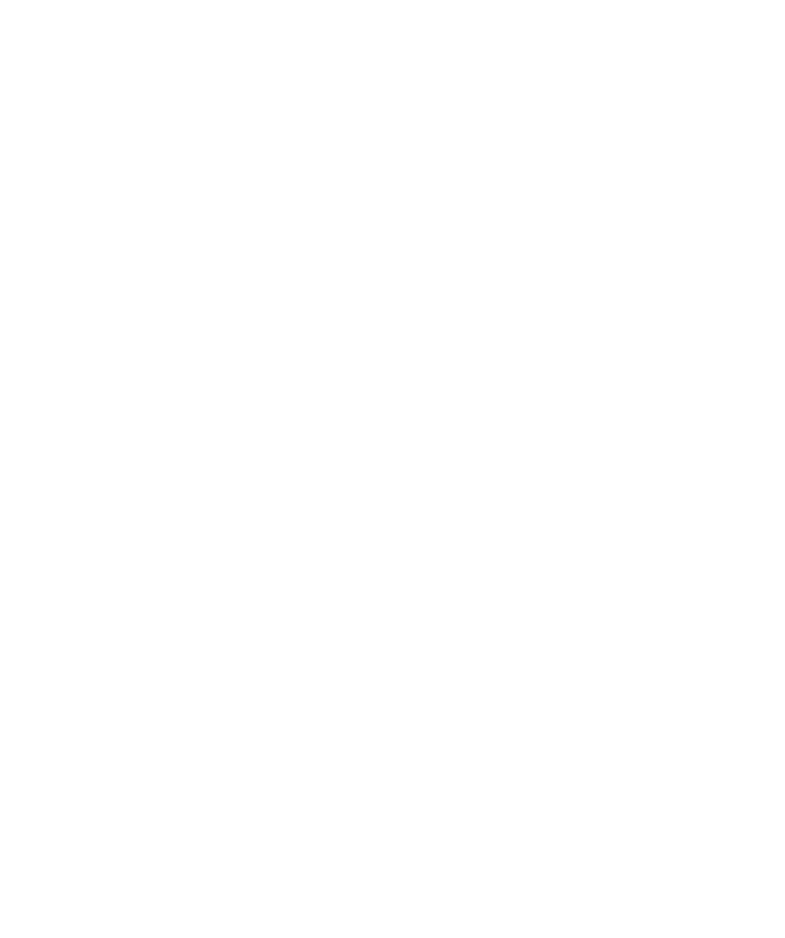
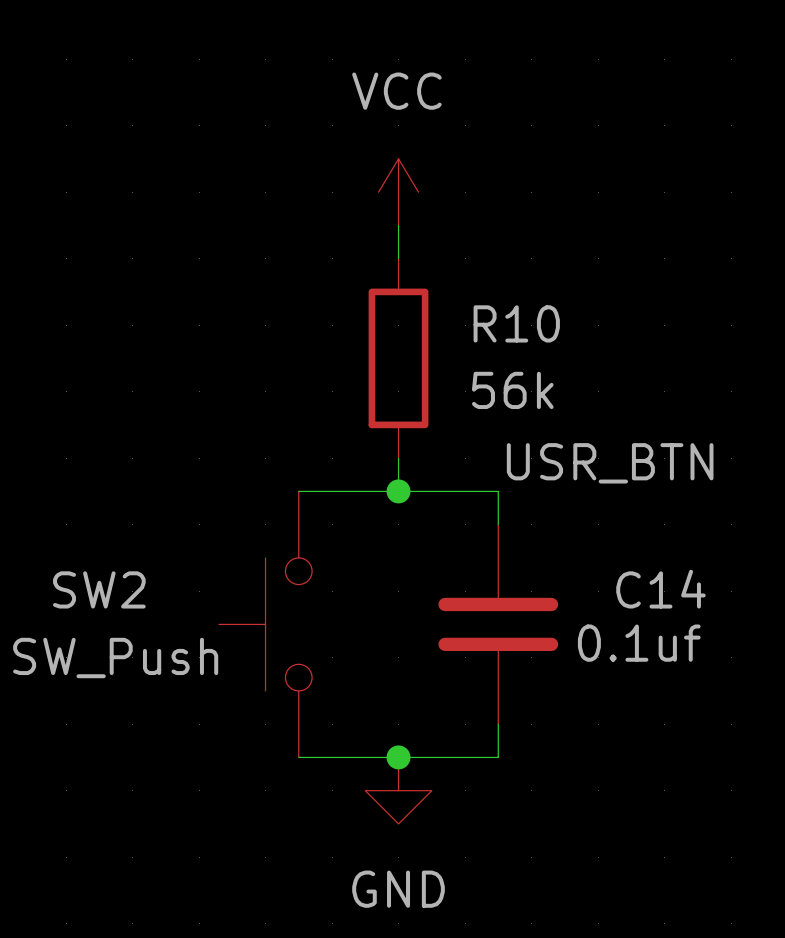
power symbol: none -> VCC (398, 192)
wire: none -> (398, 225) (398, 258)
R10: none -> 56k (398, 358)
wire: none -> (398, 458) (398, 491)
label: none -> USR_BTN (610, 463)
wire: none -> (298, 491) (498, 491) (498, 524)
junction: none -> (398, 491)
SW2: none -> SW_Push (265, 624)
C14: none -> 0.1uf (498, 624)
wire: none -> (498, 724) (498, 757) (298, 757)
junction: none -> (398, 757)
power symbol: none -> GND (398, 790)

